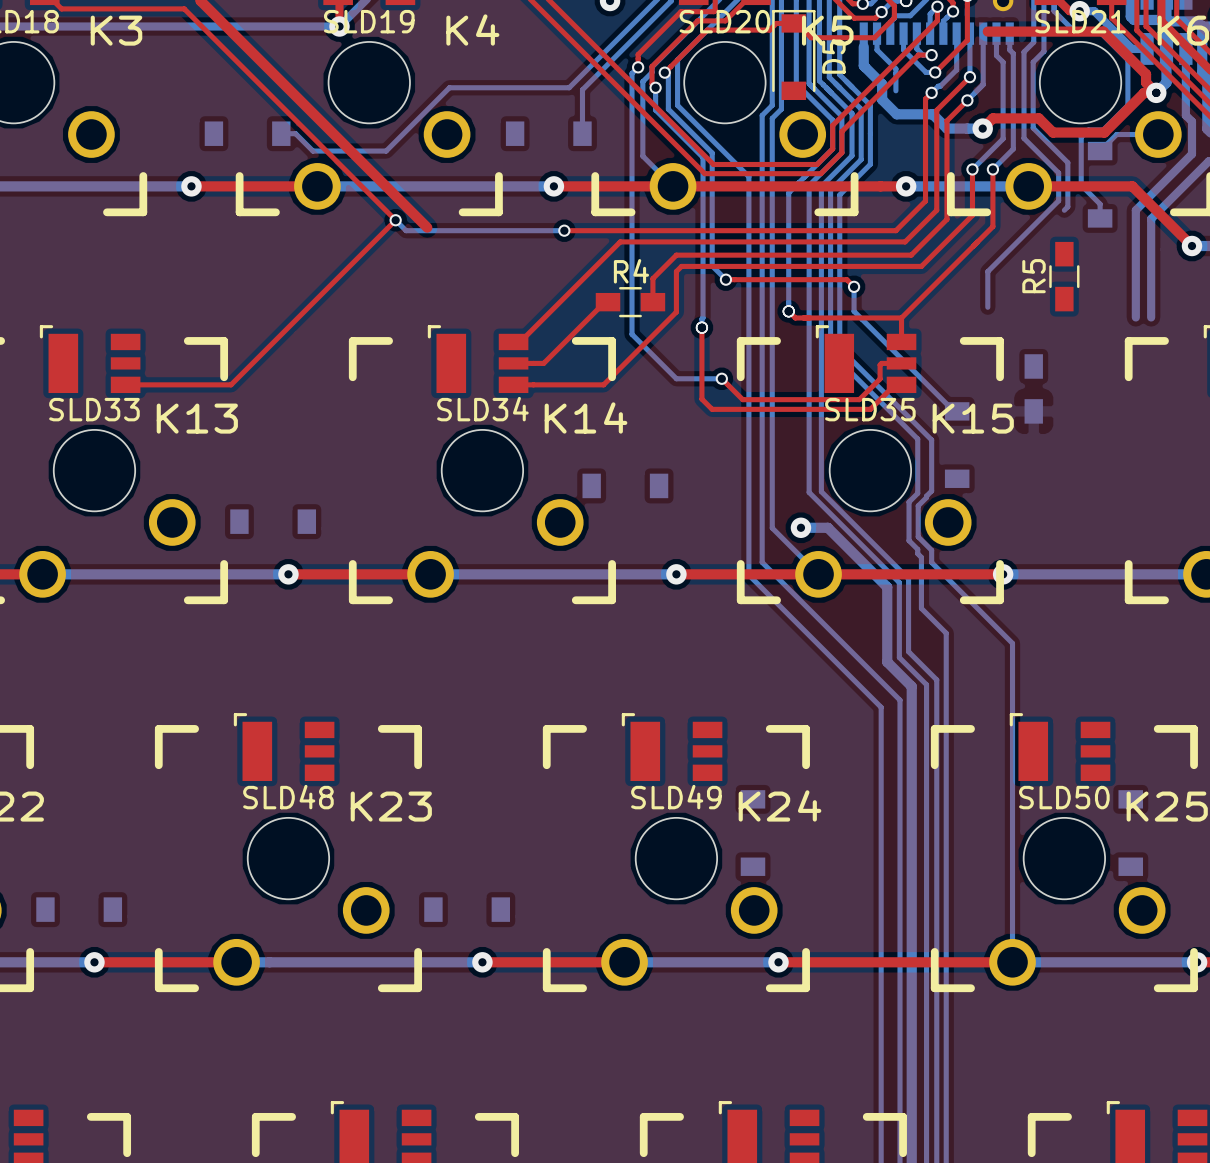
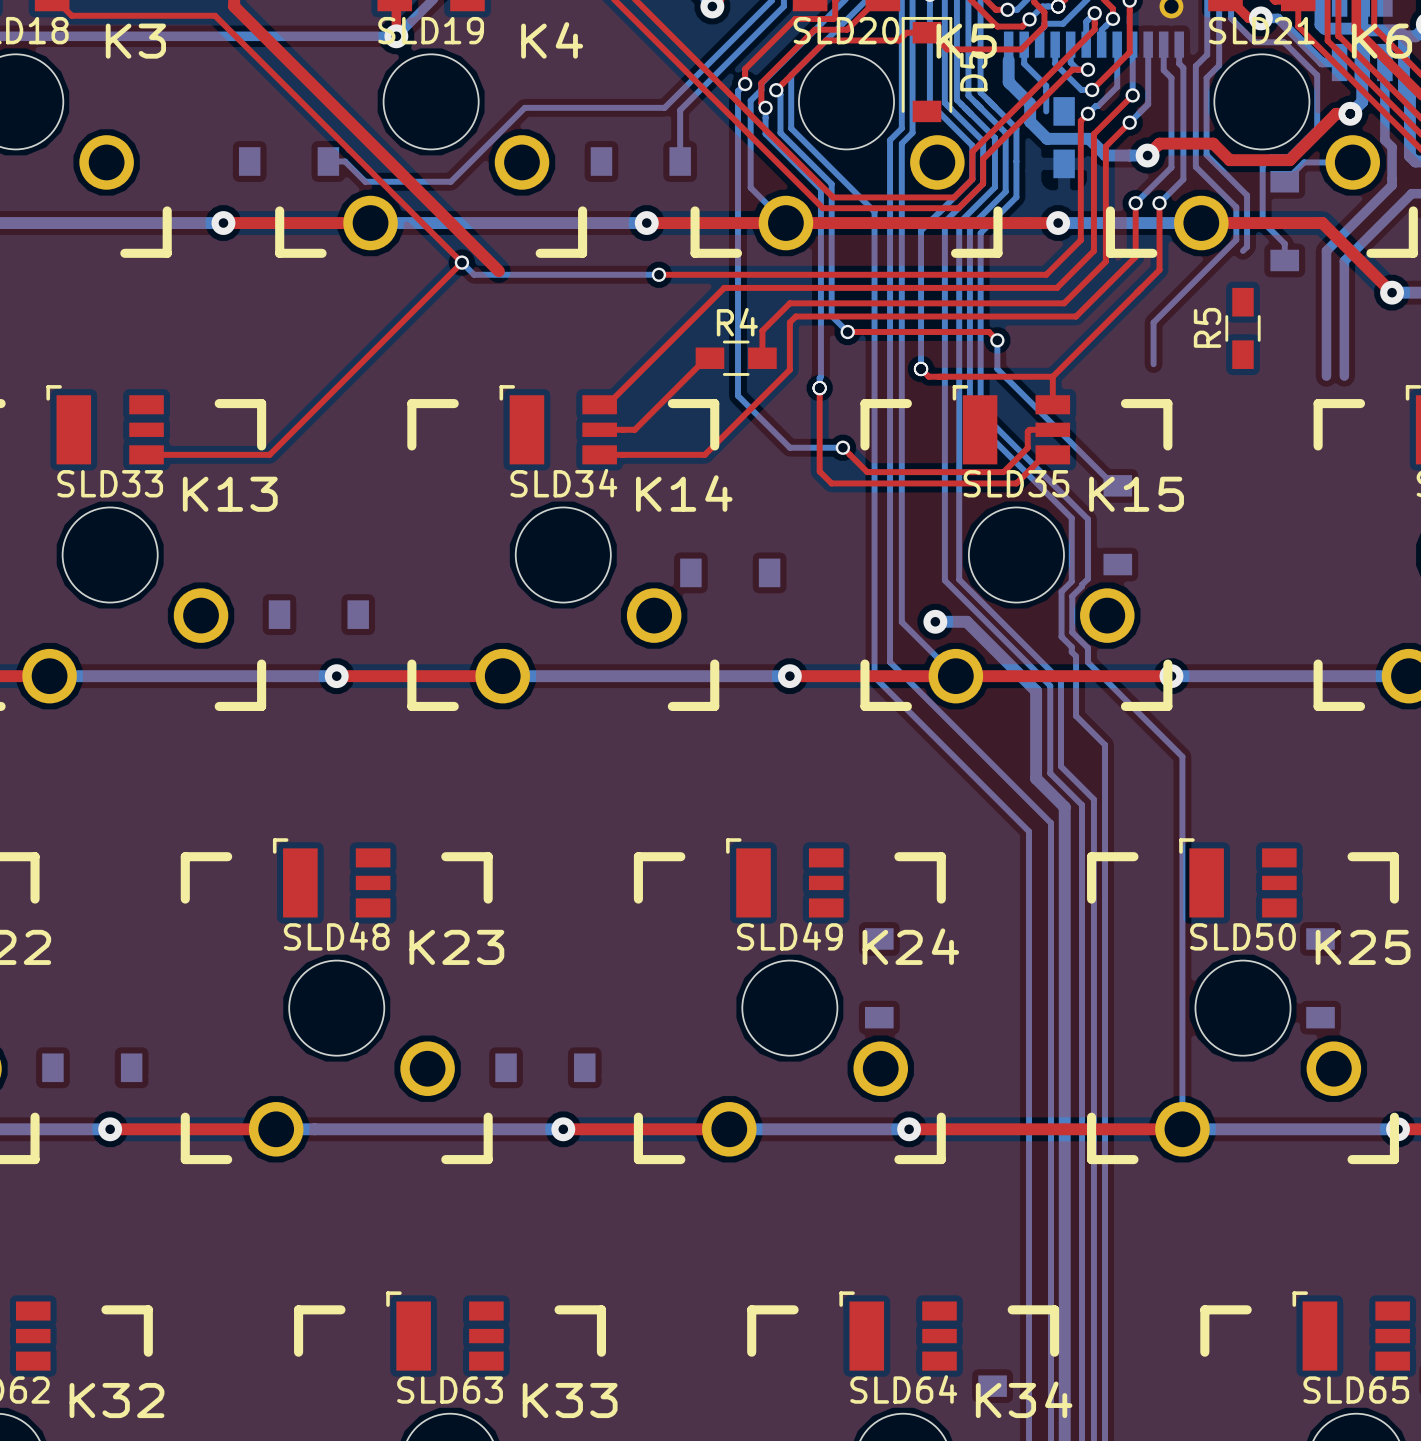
top track: (987, 31) (1103, 31) (1146, 74) (1146, 82) (1156, 92) -> none
part position: (1033, 388) -> (1064, 137)

